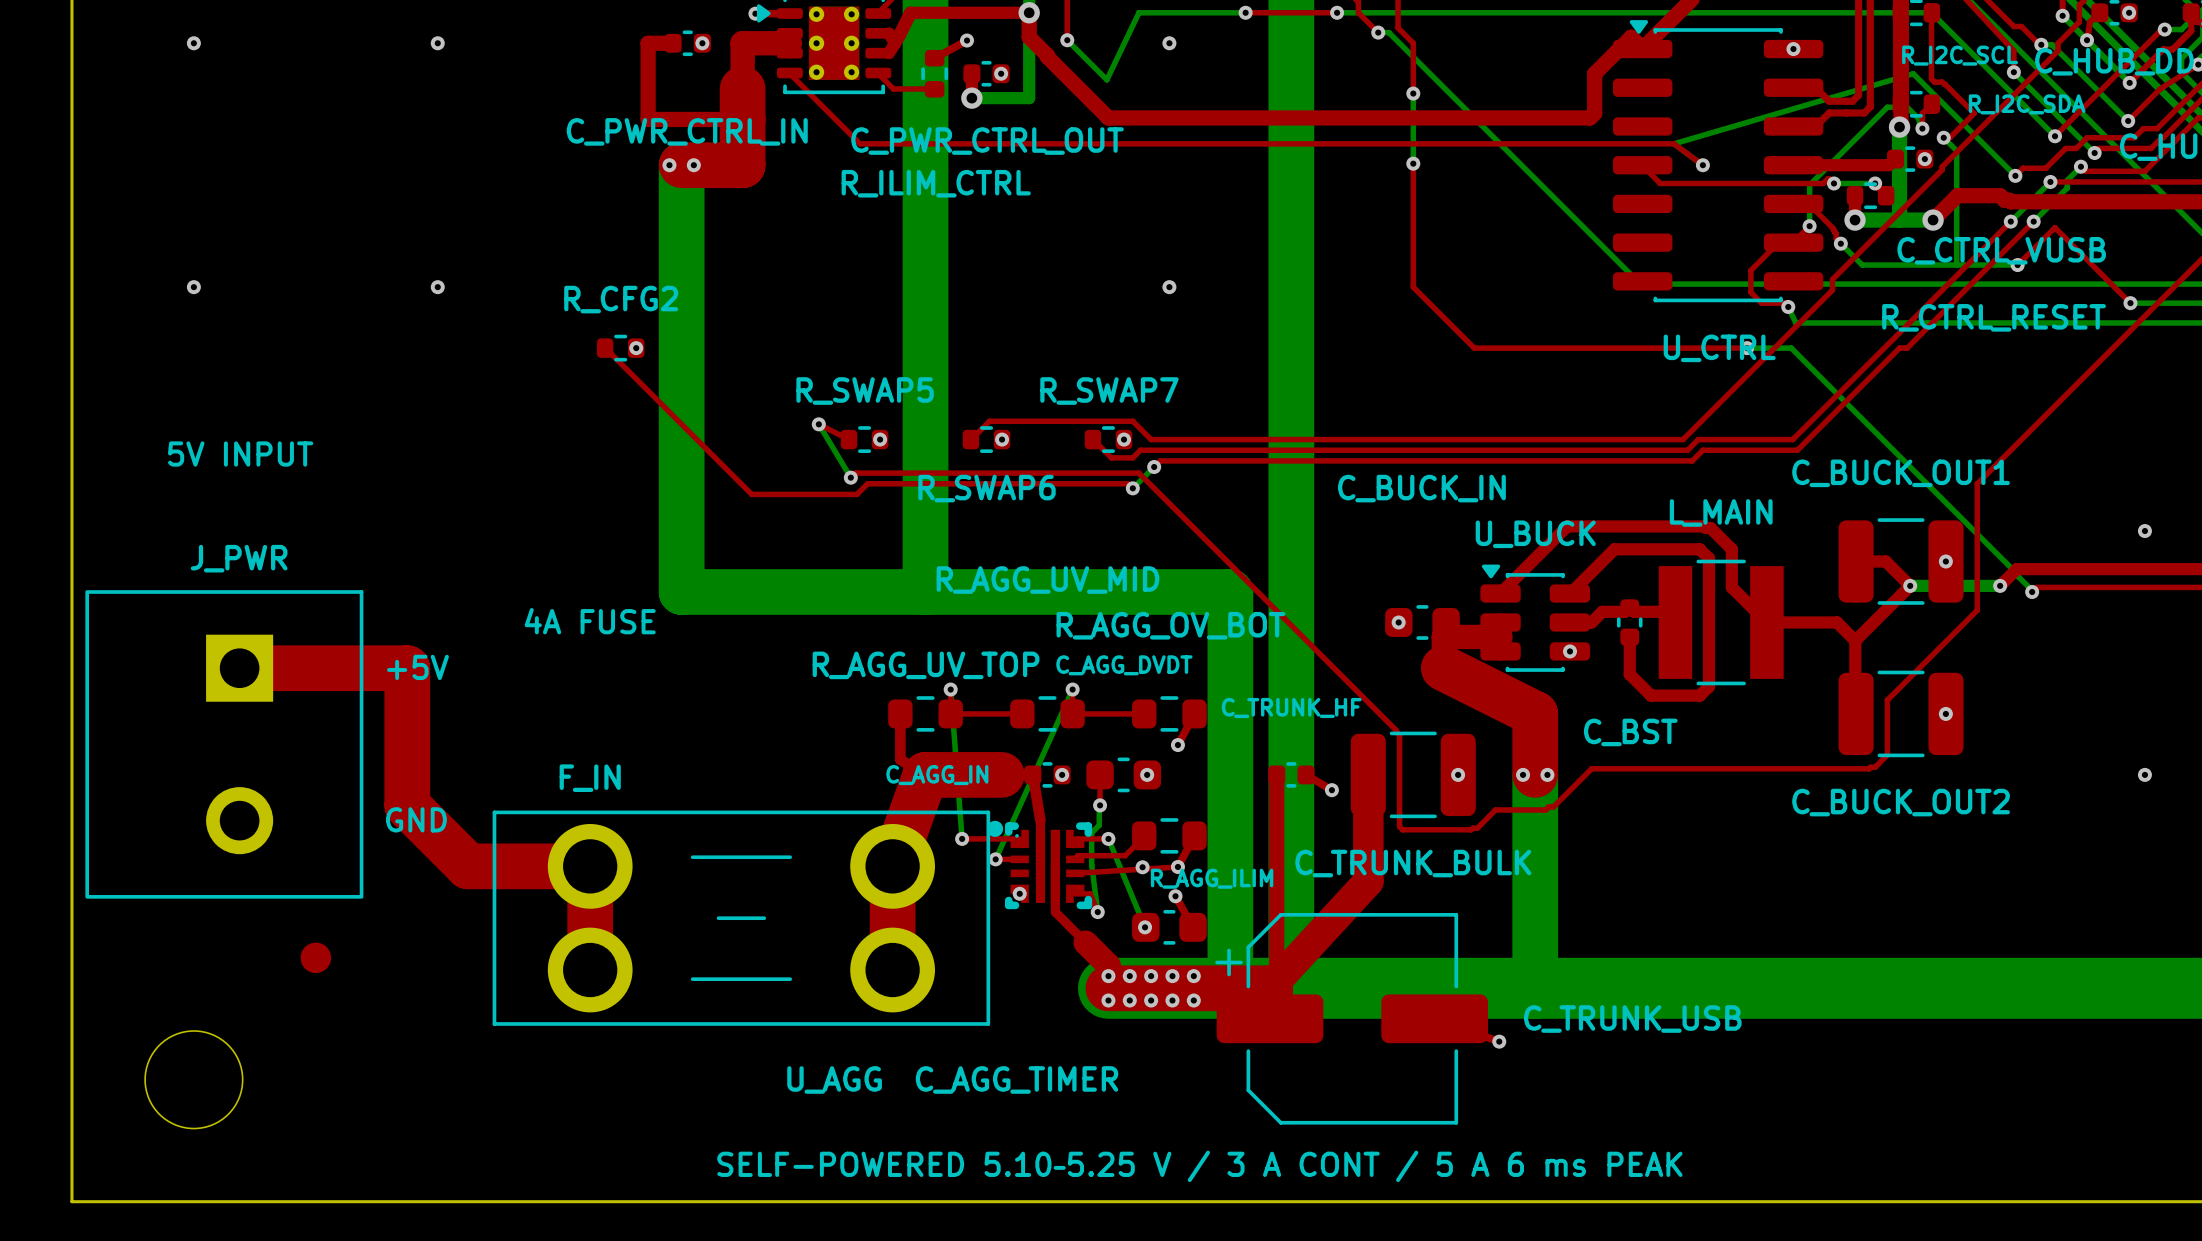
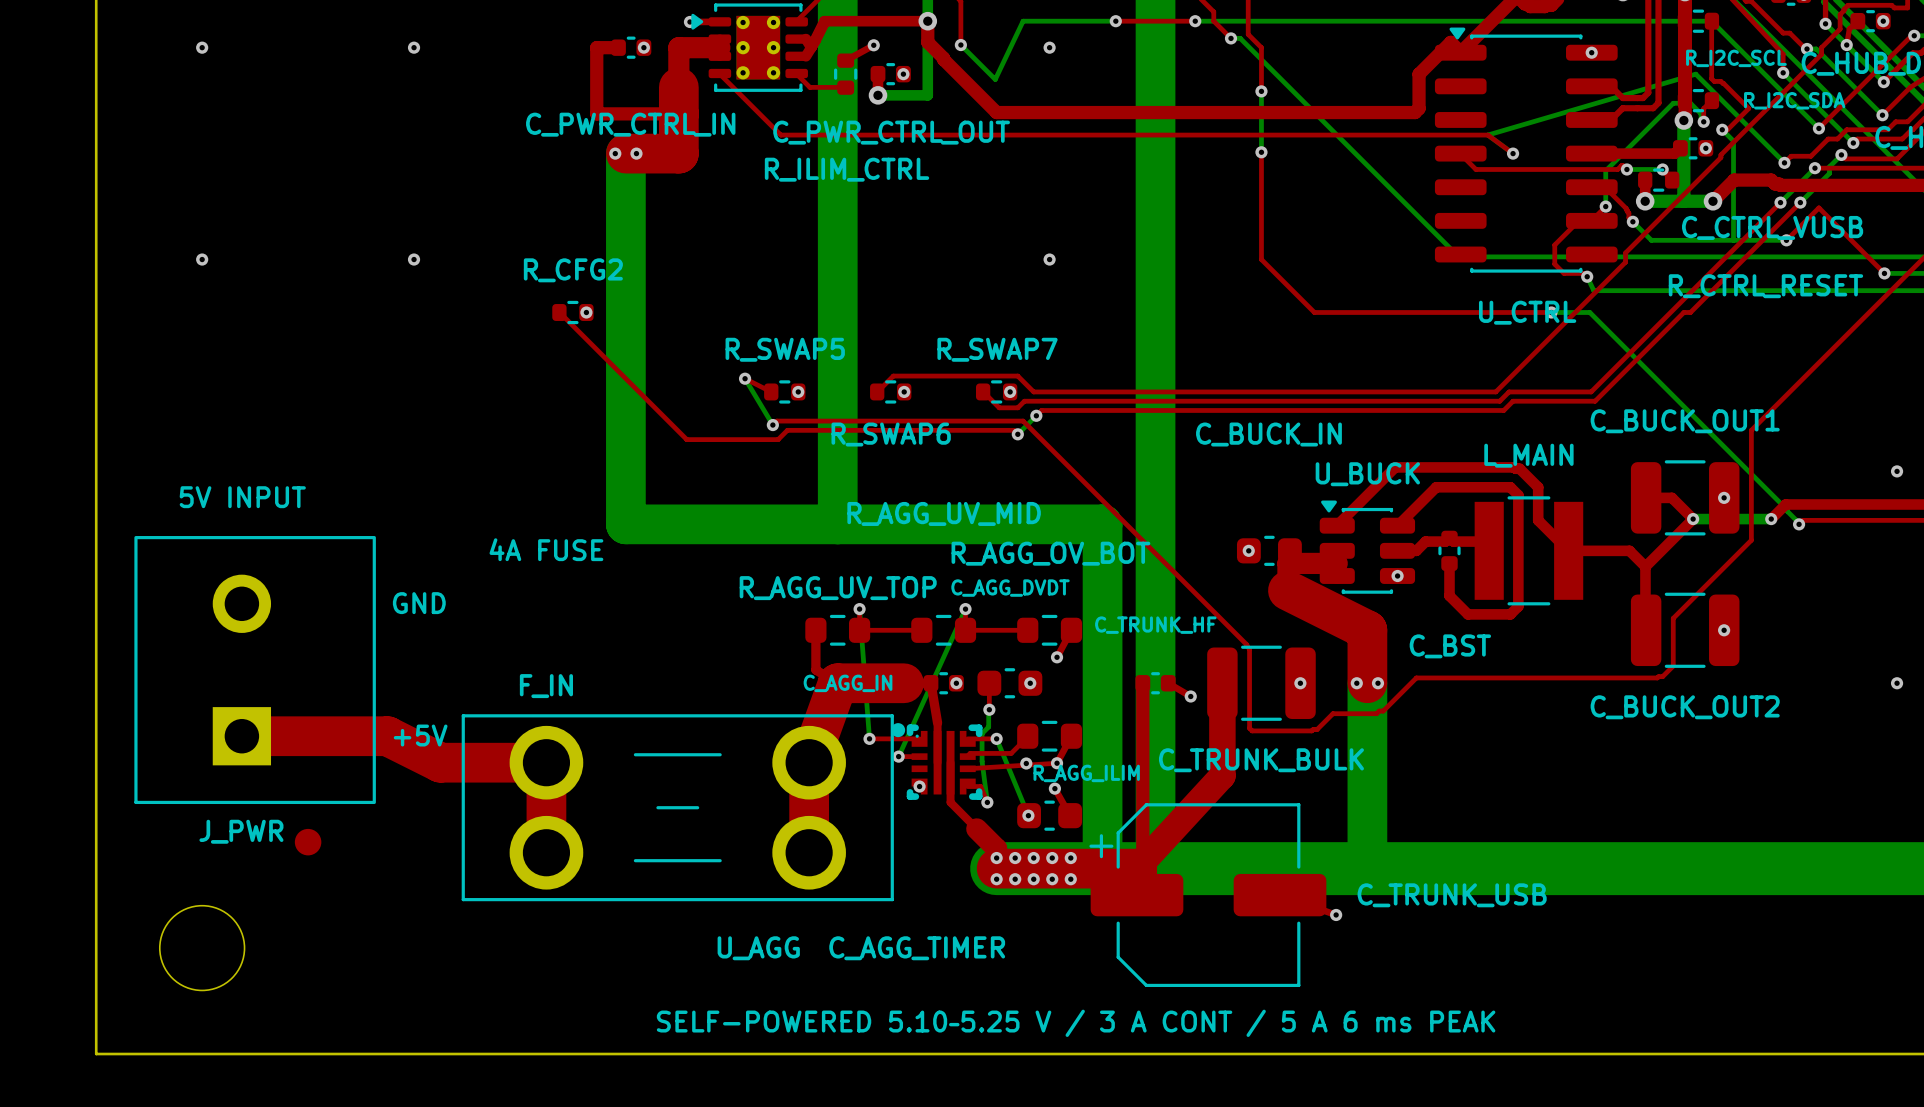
text position: 5V INPUT (240, 454) -> 5V INPUT (242, 497)
text position: +5V (417, 667) -> +5V (420, 735)
top track: (239, 668) (407, 668) (407, 805) (468, 866) -> (241, 736) (387, 736) (440, 762)
J_PWR rotation: 0° (224, 744) -> 180° (255, 670)
text position: GND (416, 819) -> GND (419, 603)

